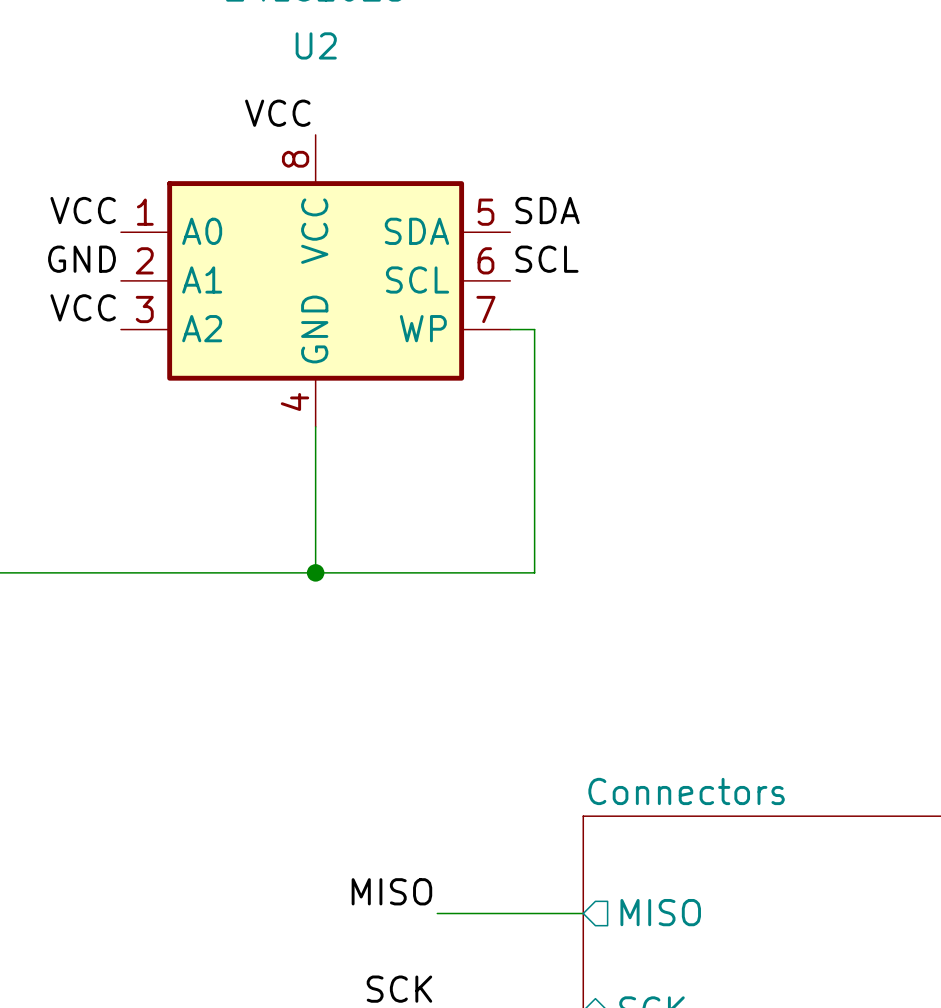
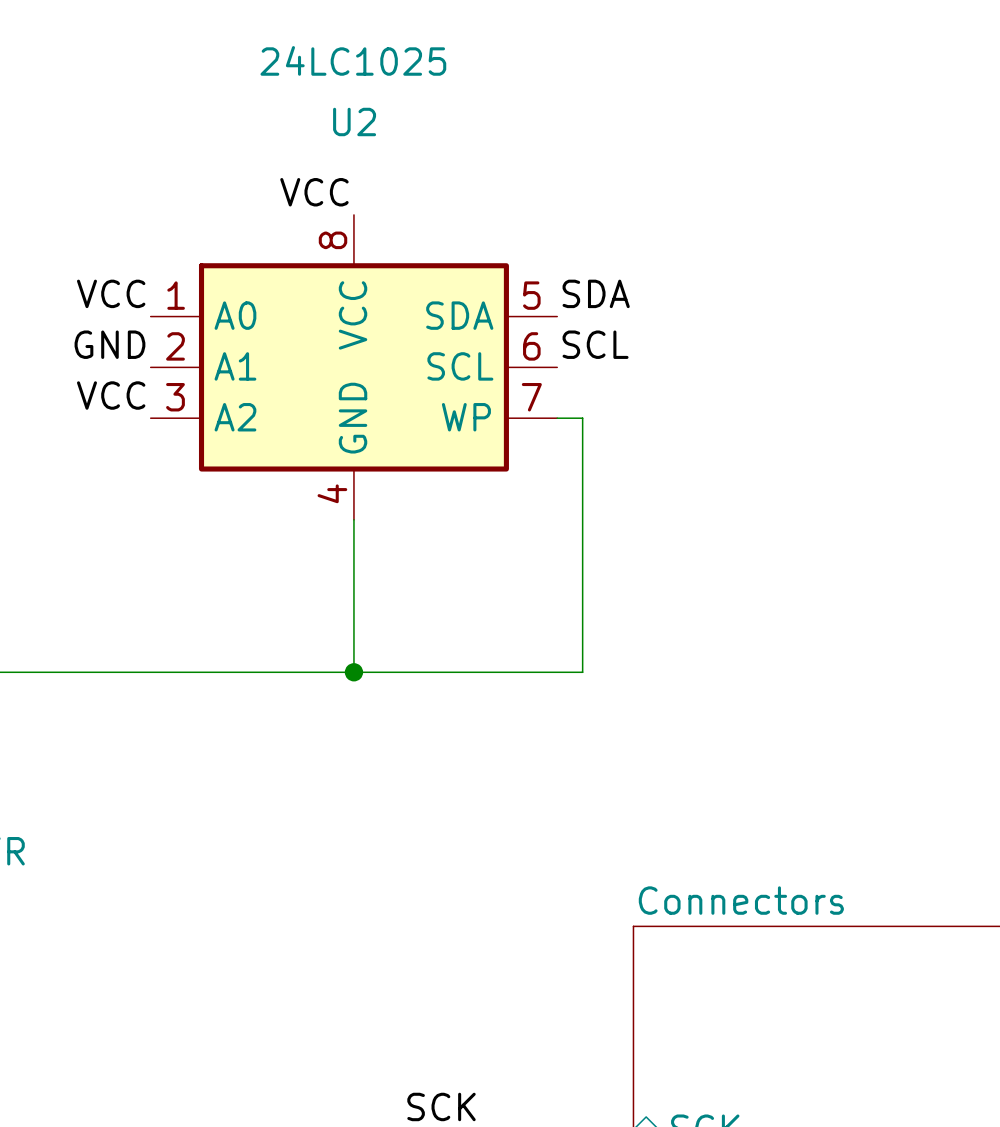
label: MISO (391, 891) -> none
sheet pin: MISO (660, 912) -> none
wire: (437, 913) (583, 913) -> none

